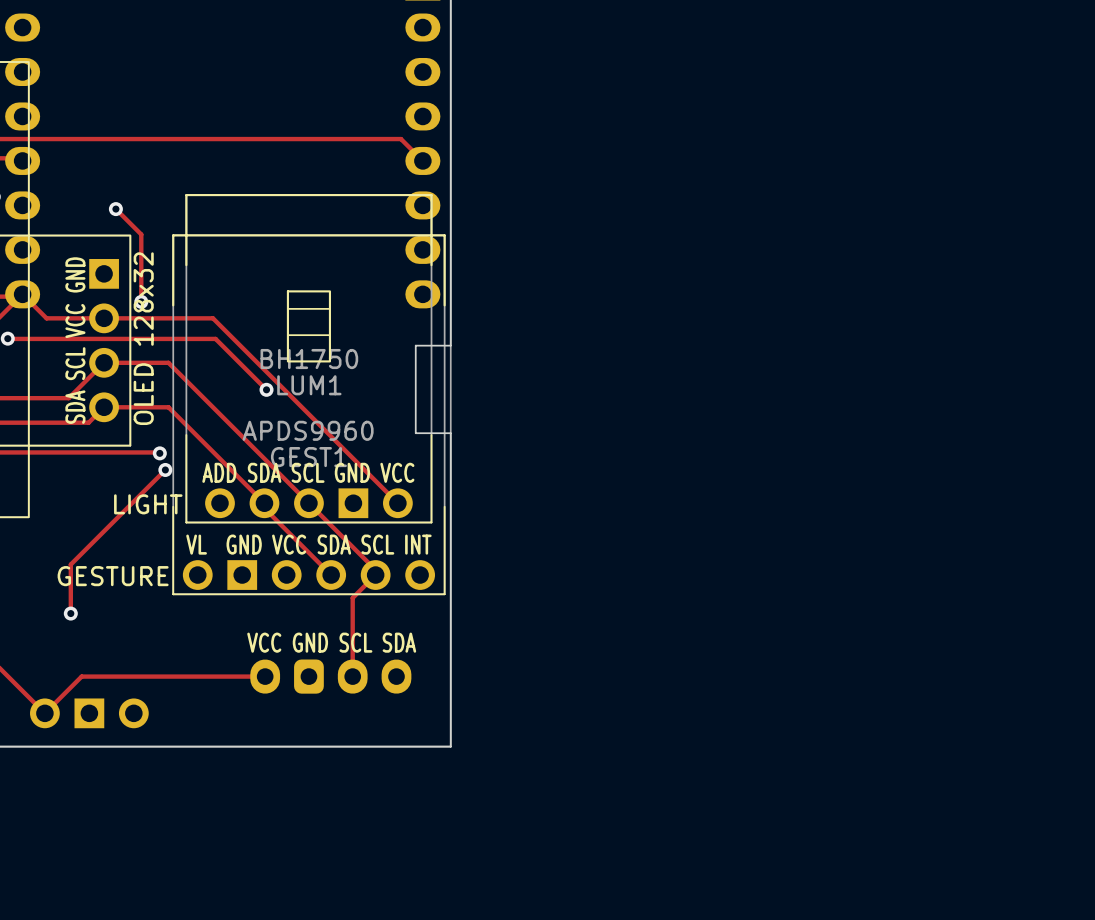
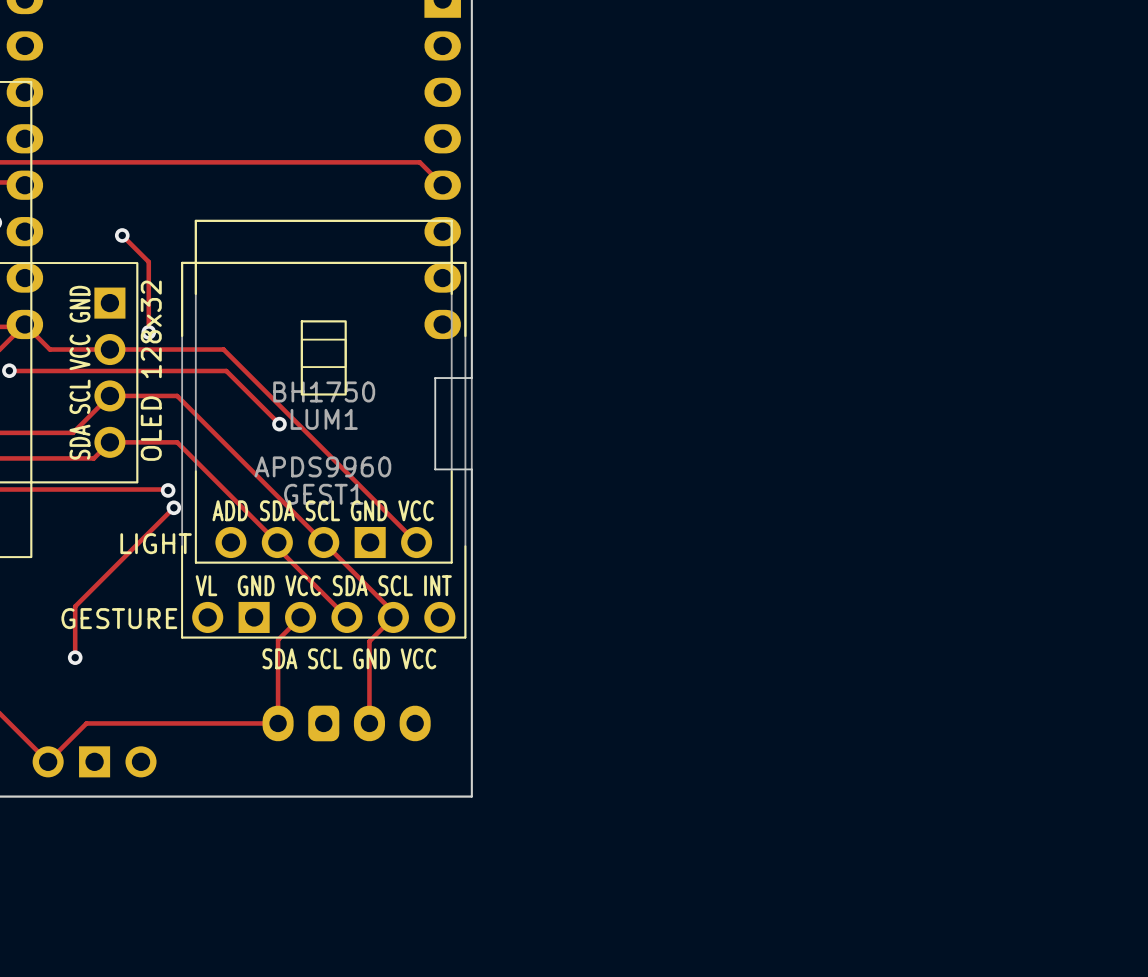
track: none -> (300, 617) (278, 639) (278, 723)
text: none -> SDA SCL GND VCC (349, 658)
text: VCC GND SCL SDA (331, 642) -> none

